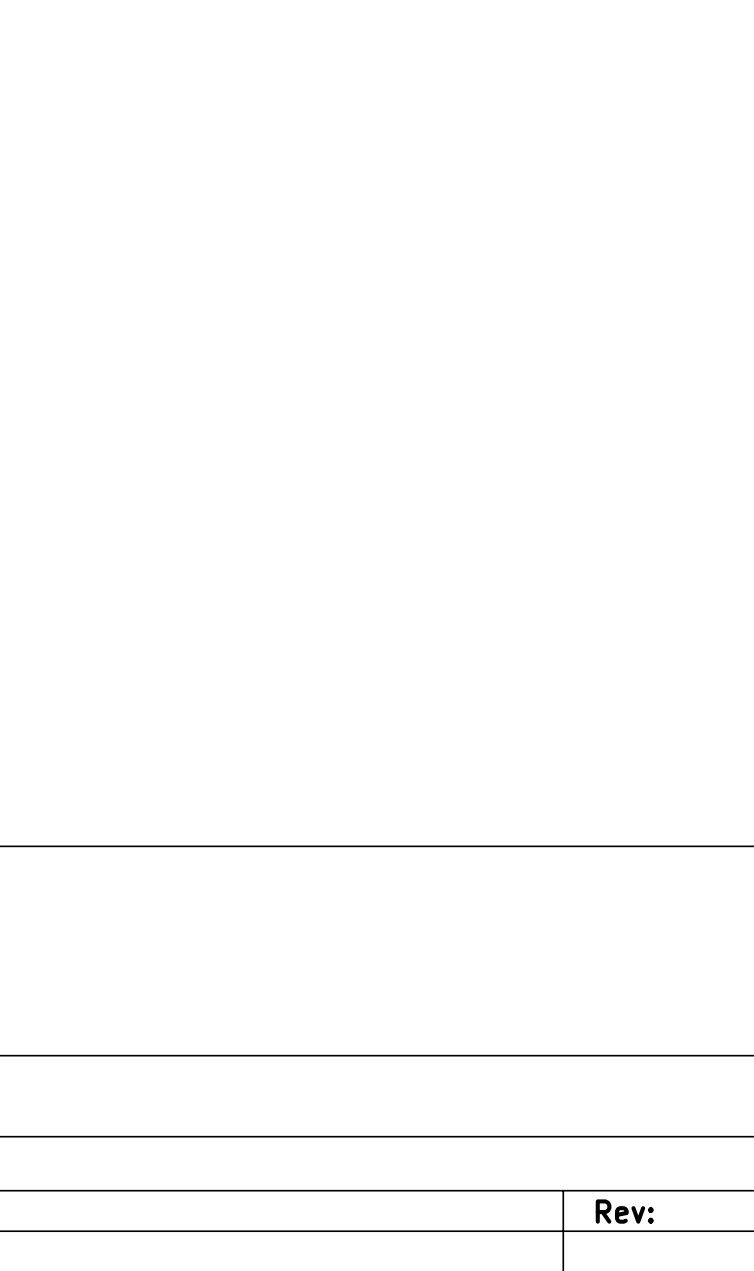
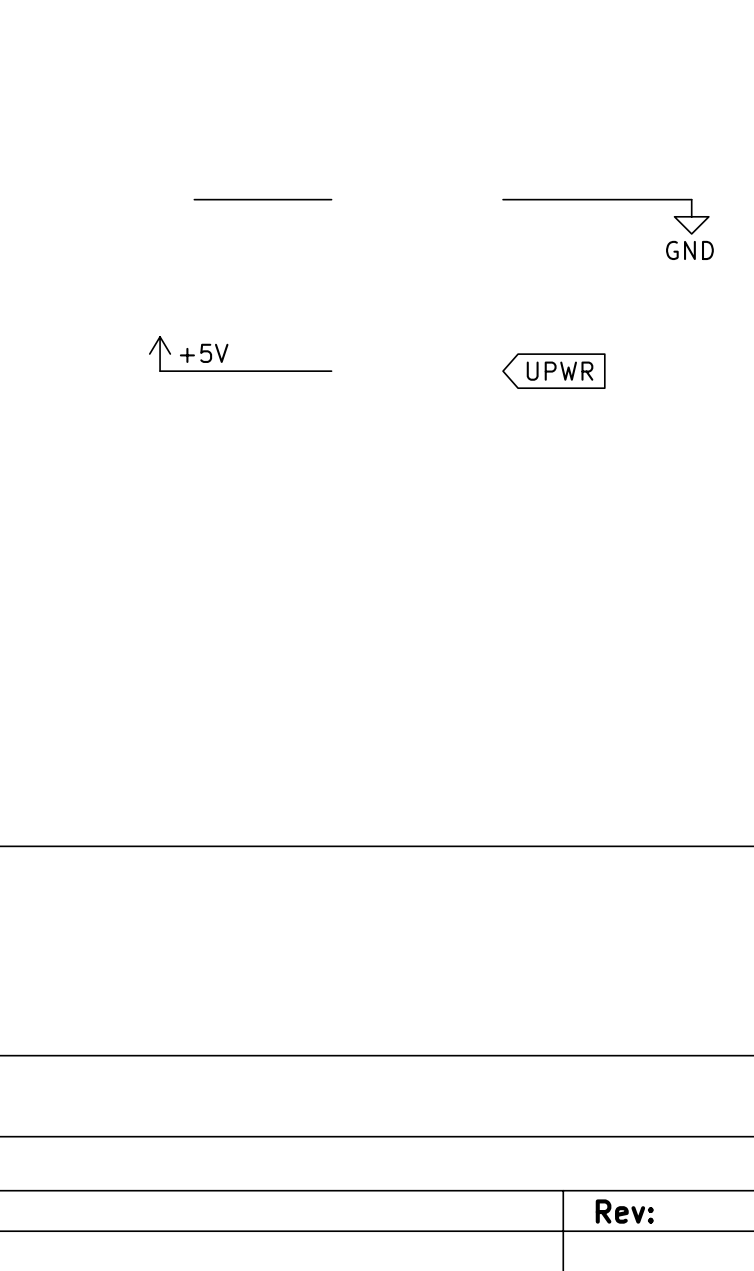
wire: none -> (194, 199) (331, 199)
wire: none -> (503, 199) (691, 199)
power symbol: none -> GND (691, 216)
power symbol: none -> +5V (160, 354)
wire: none -> (160, 371) (331, 371)
global label: none -> UPWR (560, 371)

